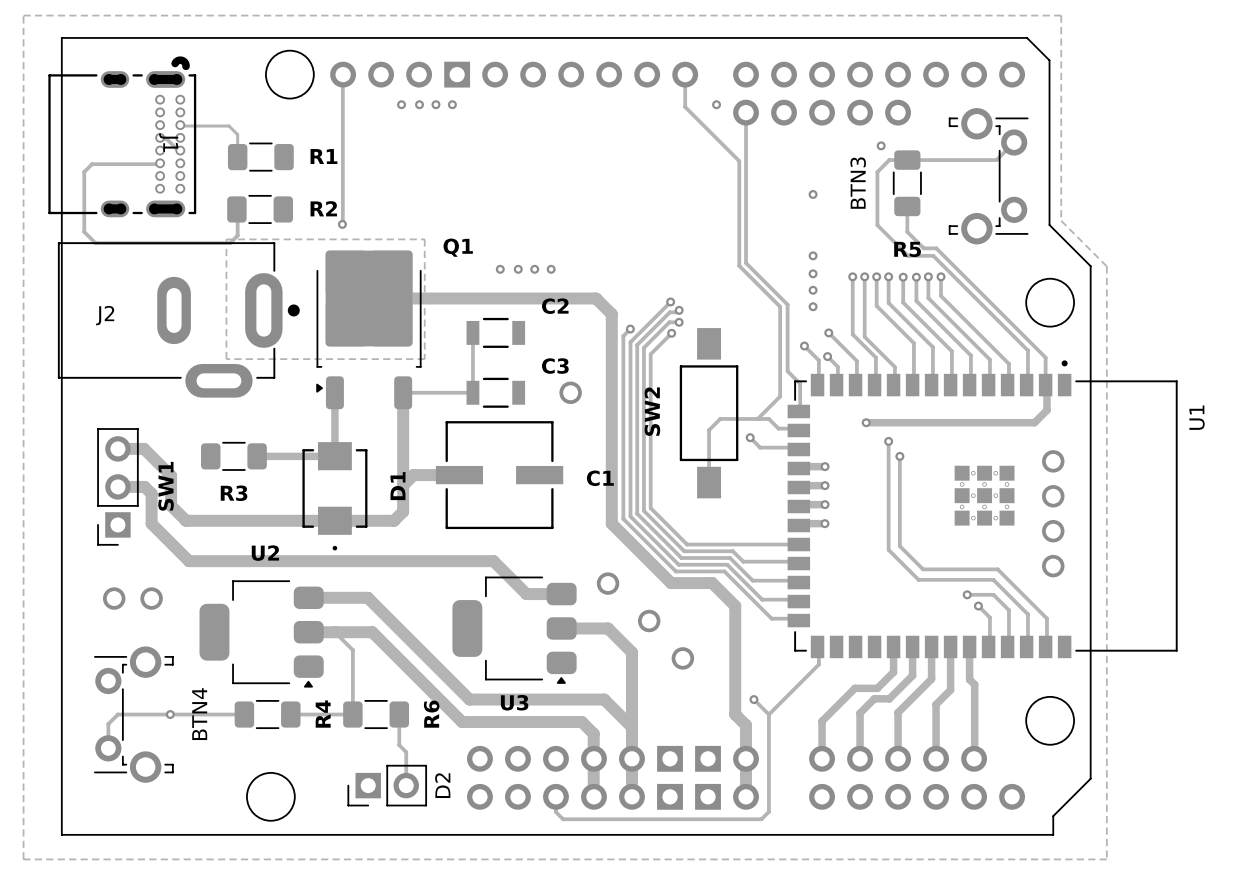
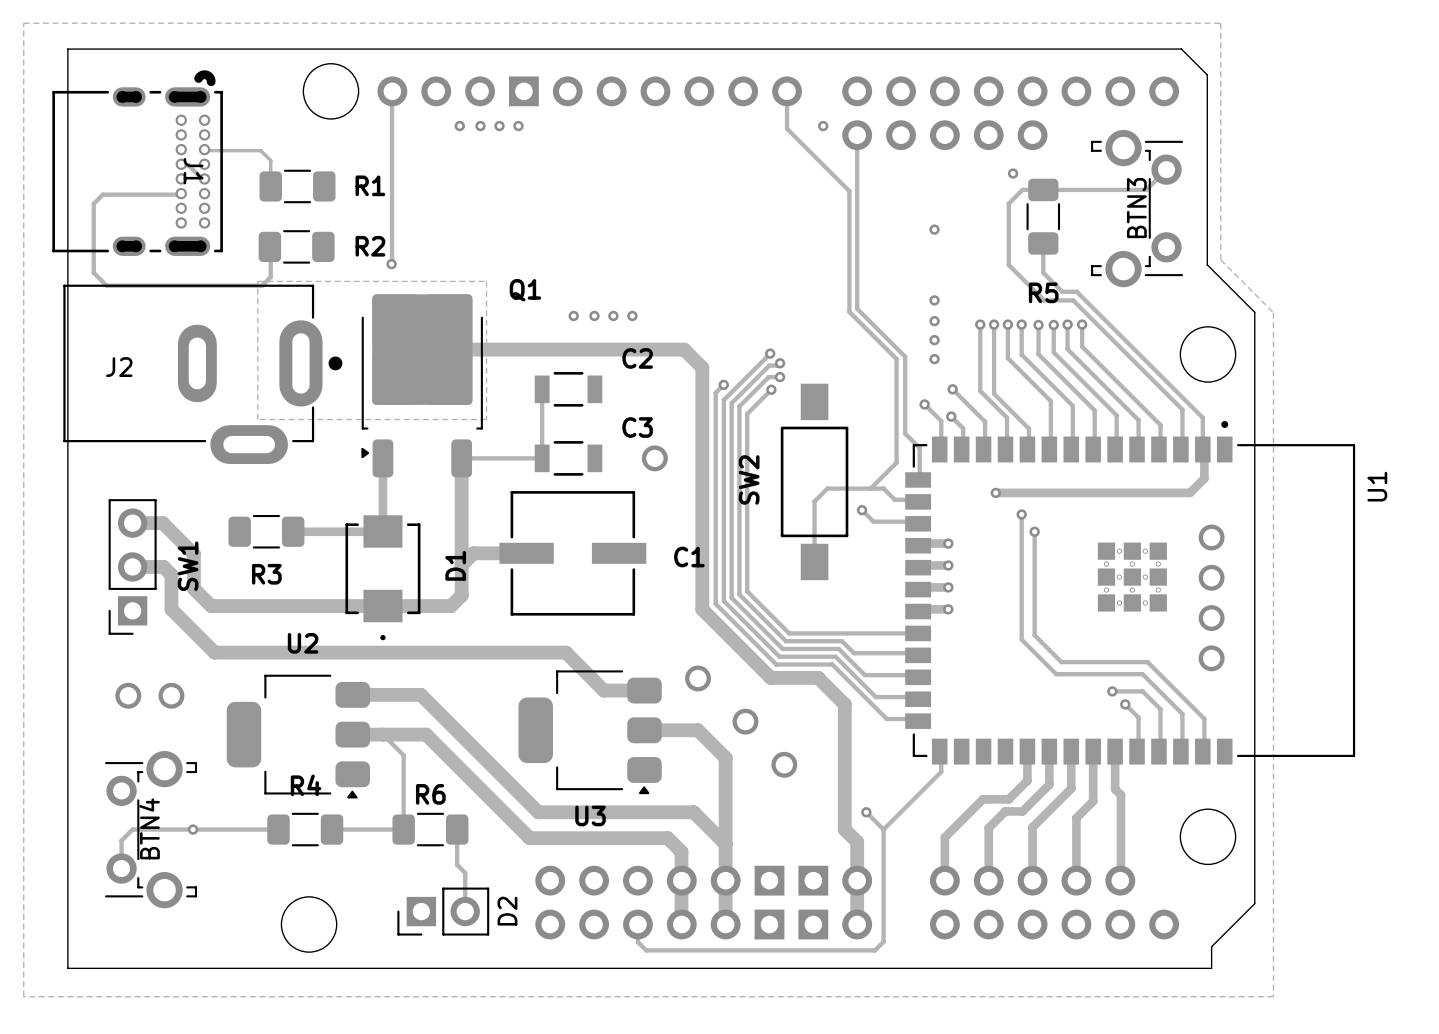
BTN3 name position: BTN3 (858, 183) -> BTN3 (1136, 208)
BTN4 name position: BTN4 (199, 714) -> BTN4 (149, 828)
R4 name rotation: 0° (323, 714) -> 90° clockwise (306, 785)
R4 name position: R4 (323, 714) -> R4 (306, 785)
R6 name rotation: 0° (431, 714) -> 90° clockwise (430, 794)
R6 name position: R6 (431, 714) -> R6 (430, 794)

